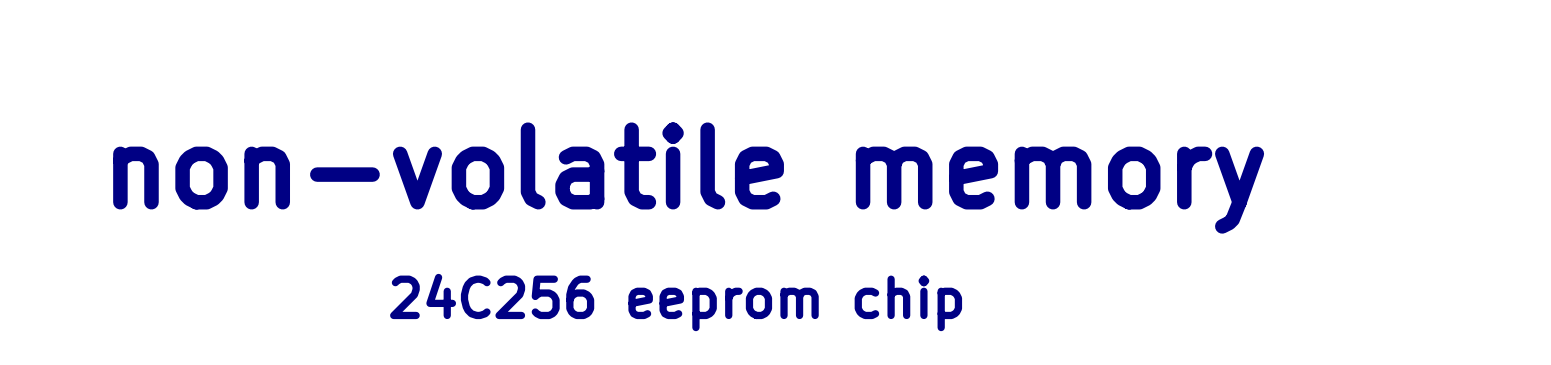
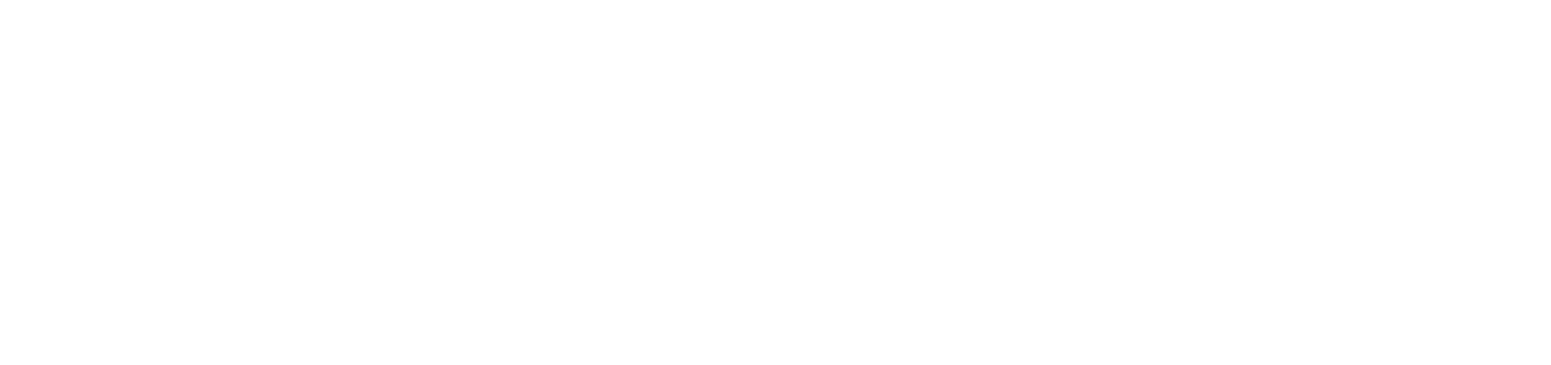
text: non-volatile memory (688, 178) -> none
text: 24C256 eeprom chip (676, 302) -> none

